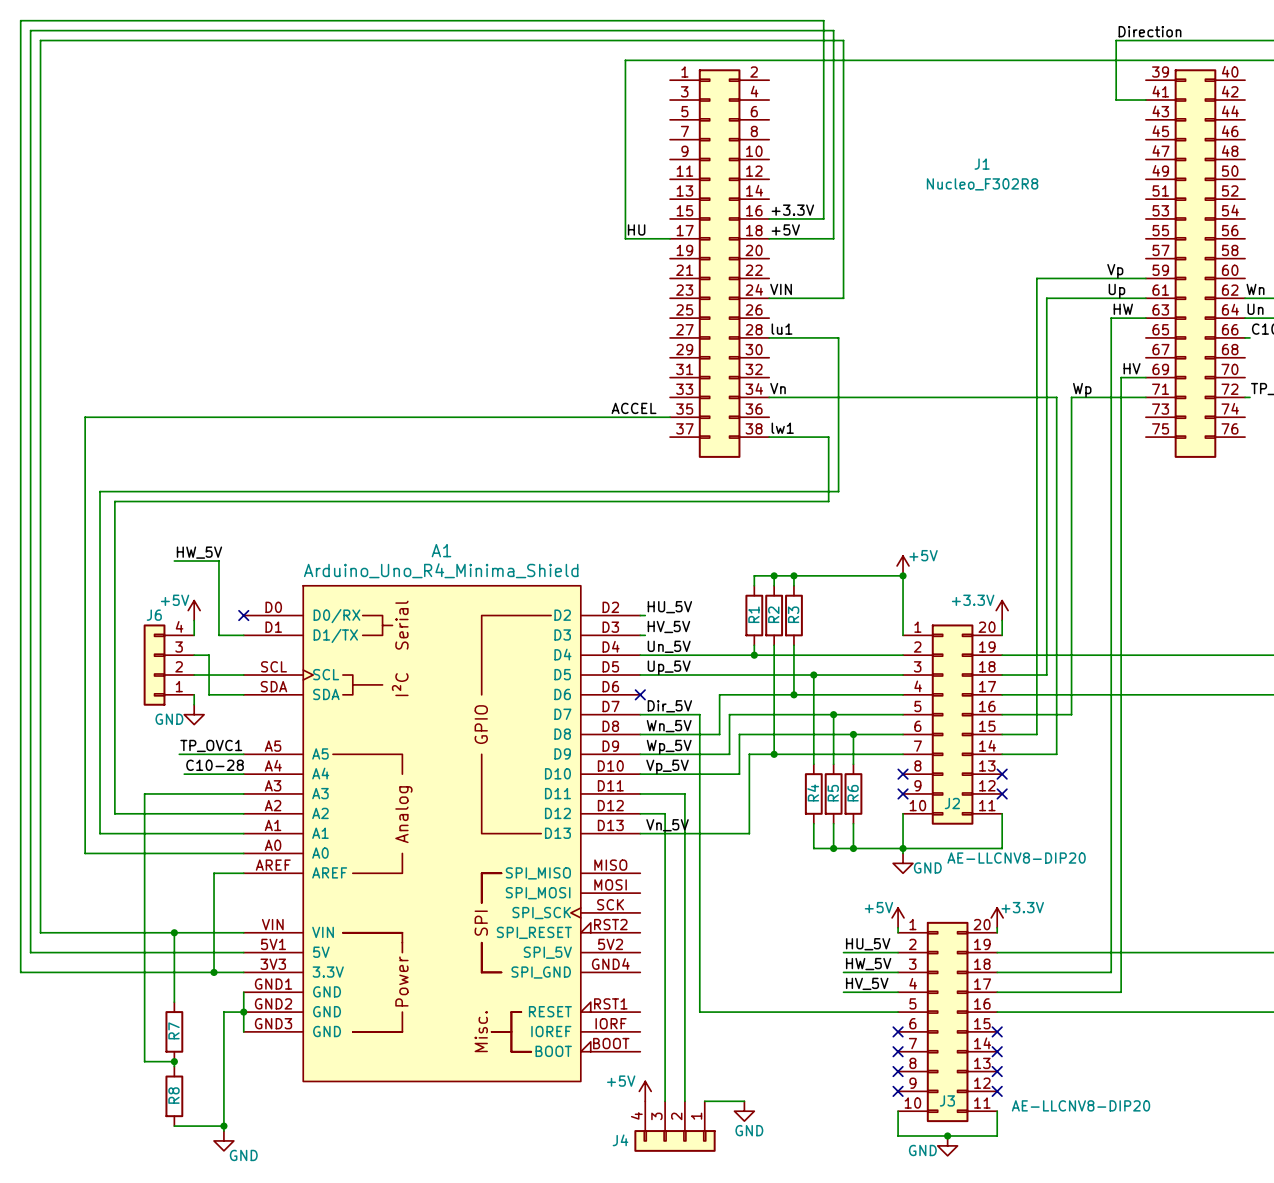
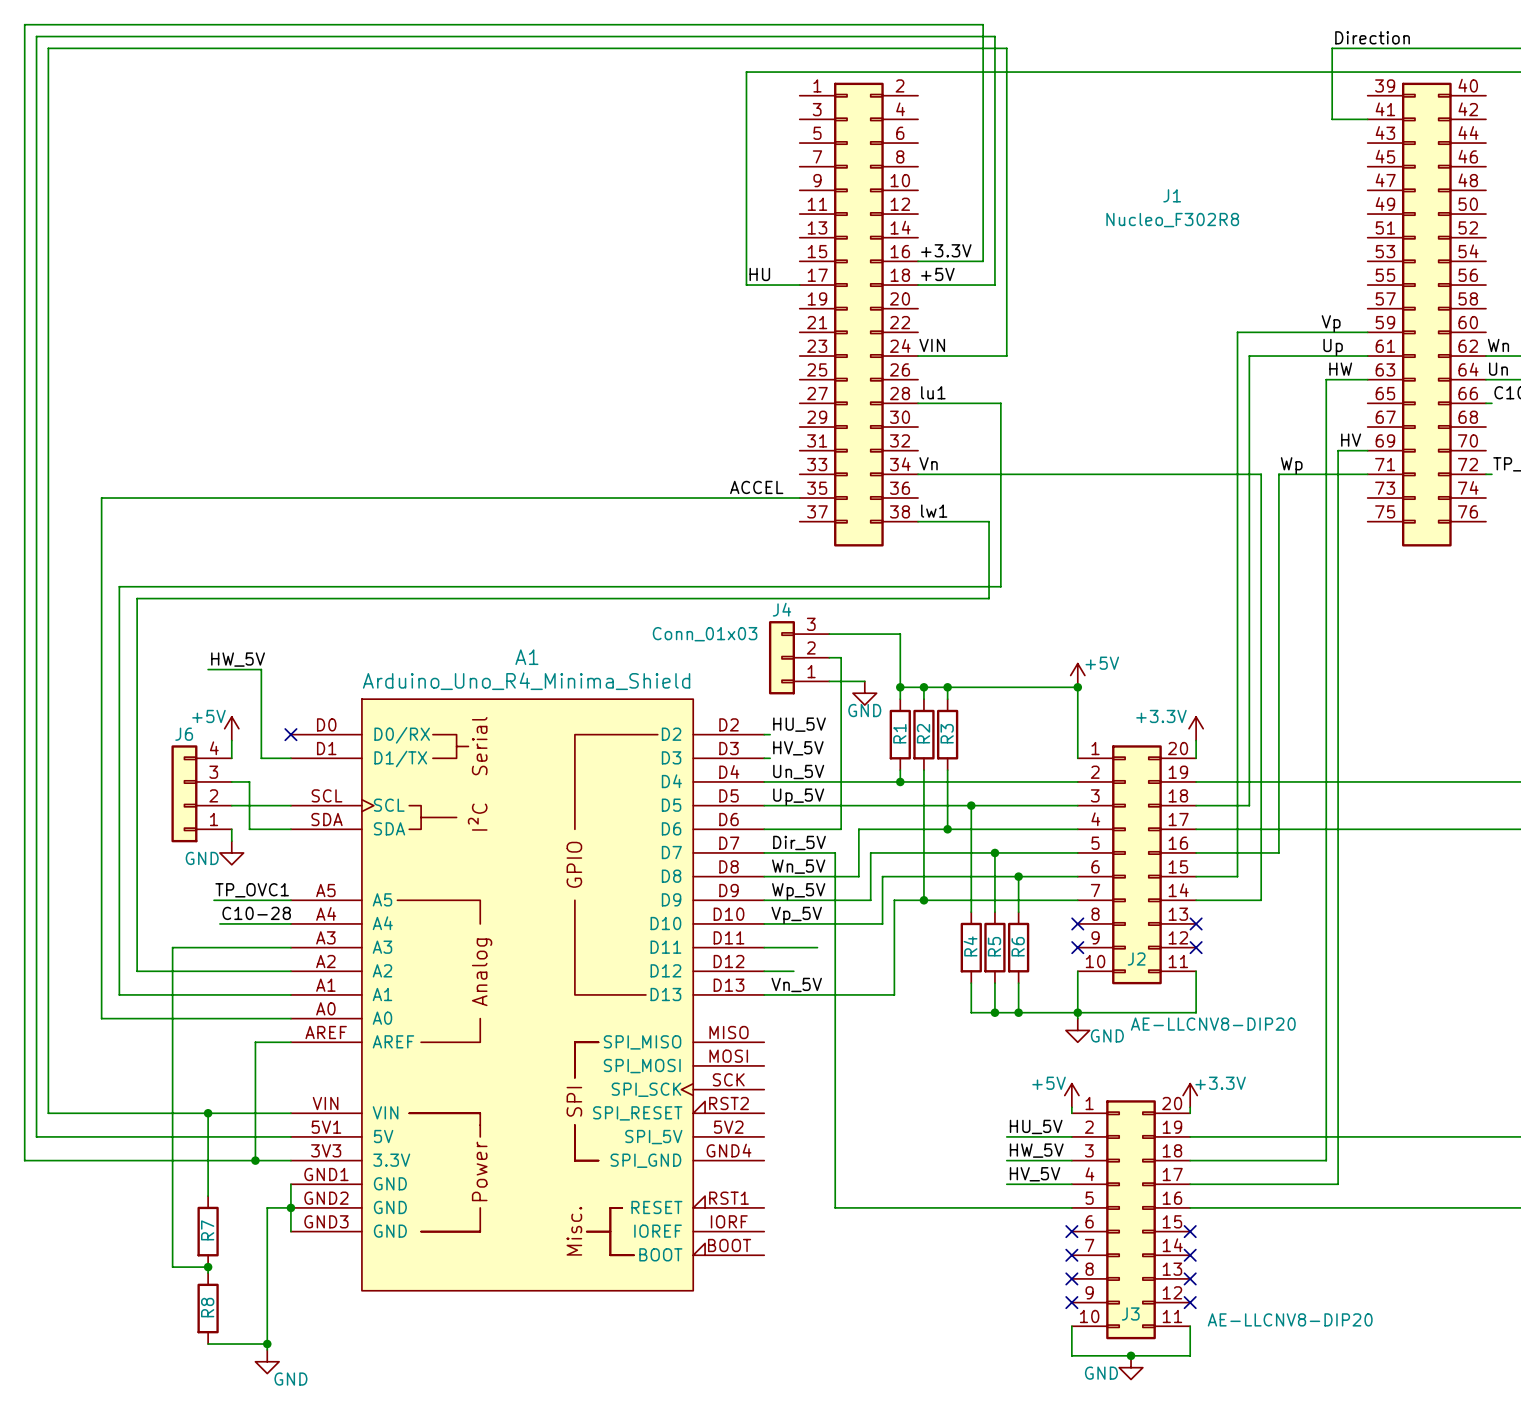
J4 value: none -> Conn_01x03 (705, 634)
wire: none -> (829, 634) (900, 634) (900, 687)
wire: none -> (829, 657) (841, 657) (841, 829) (764, 829)
wire: none -> (829, 681) (864, 681)
junction: none -> (900, 687)
power symbol: none -> GND (864, 693)
no-connect mark: (640, 694) -> none
wire: (684, 793) (684, 1101) -> none
wire: (665, 813) (665, 1101) -> none
power symbol: +5V (645, 1091) -> none
J4 symbol: [634, 1101, 716, 1152] -> [768, 621, 830, 695]
wire: (704, 1101) (744, 1101) -> none
power symbol: GND (744, 1111) -> none
J4 name position: J4 (620, 1140) -> J4 (781, 609)

